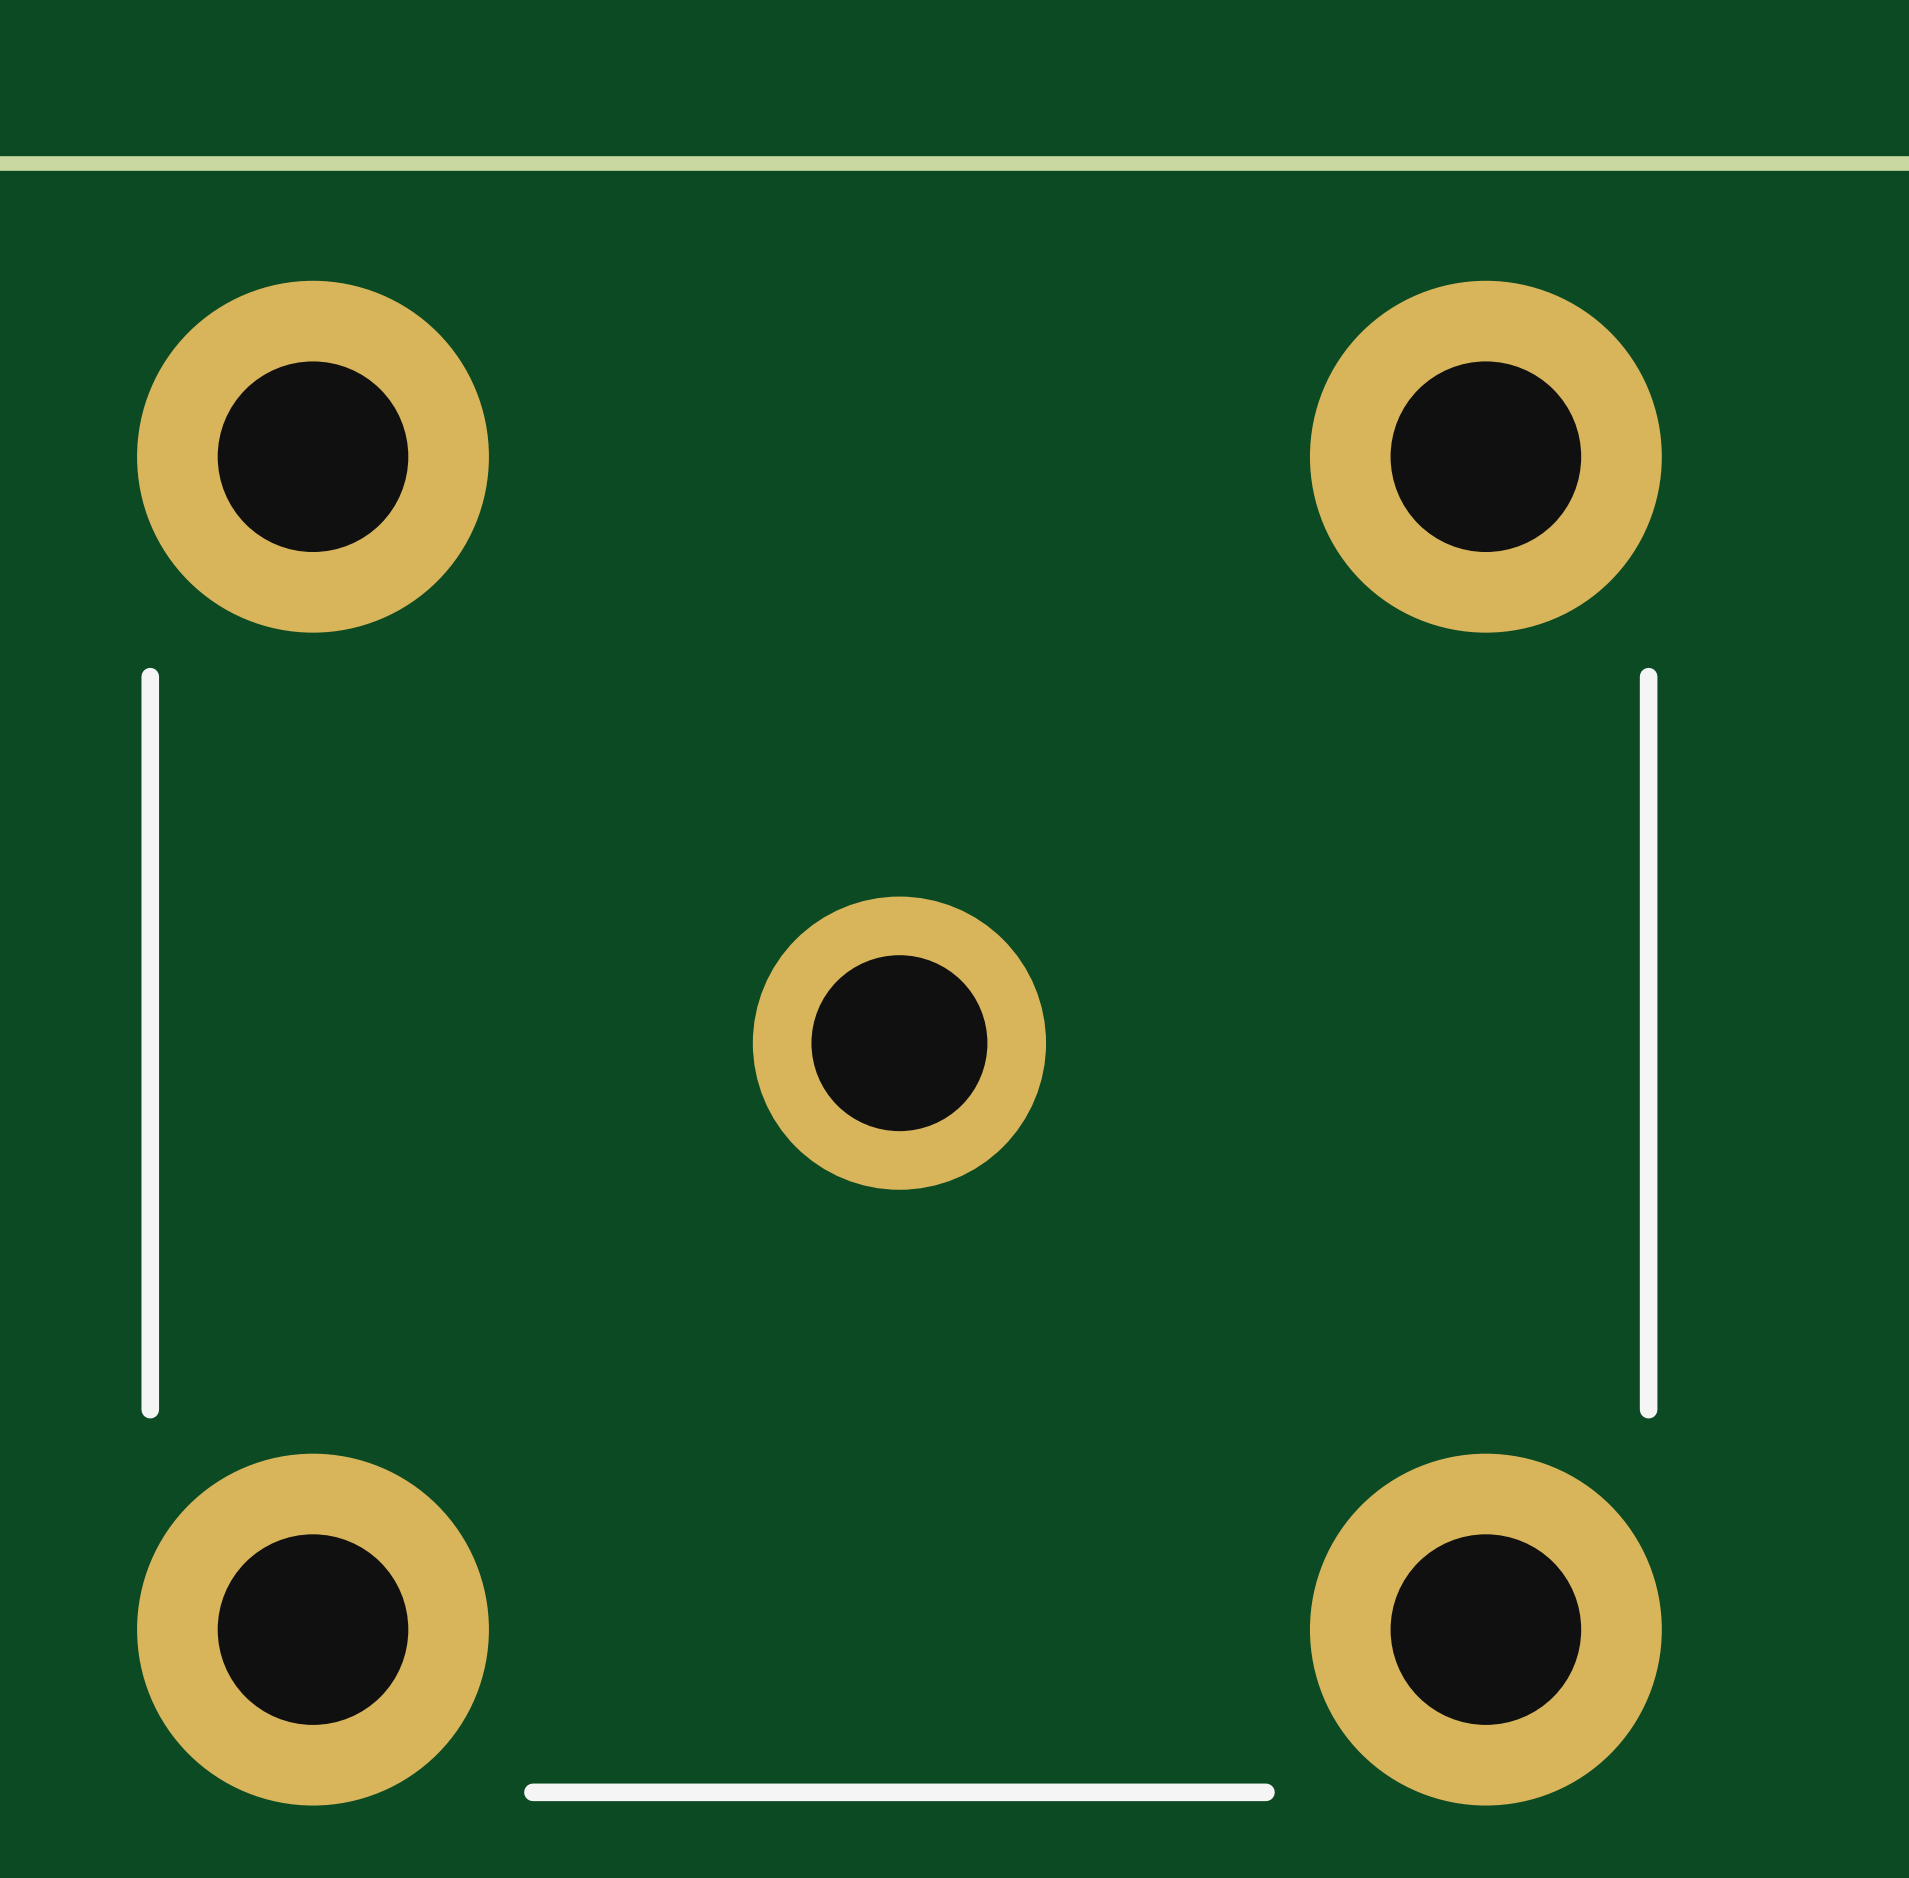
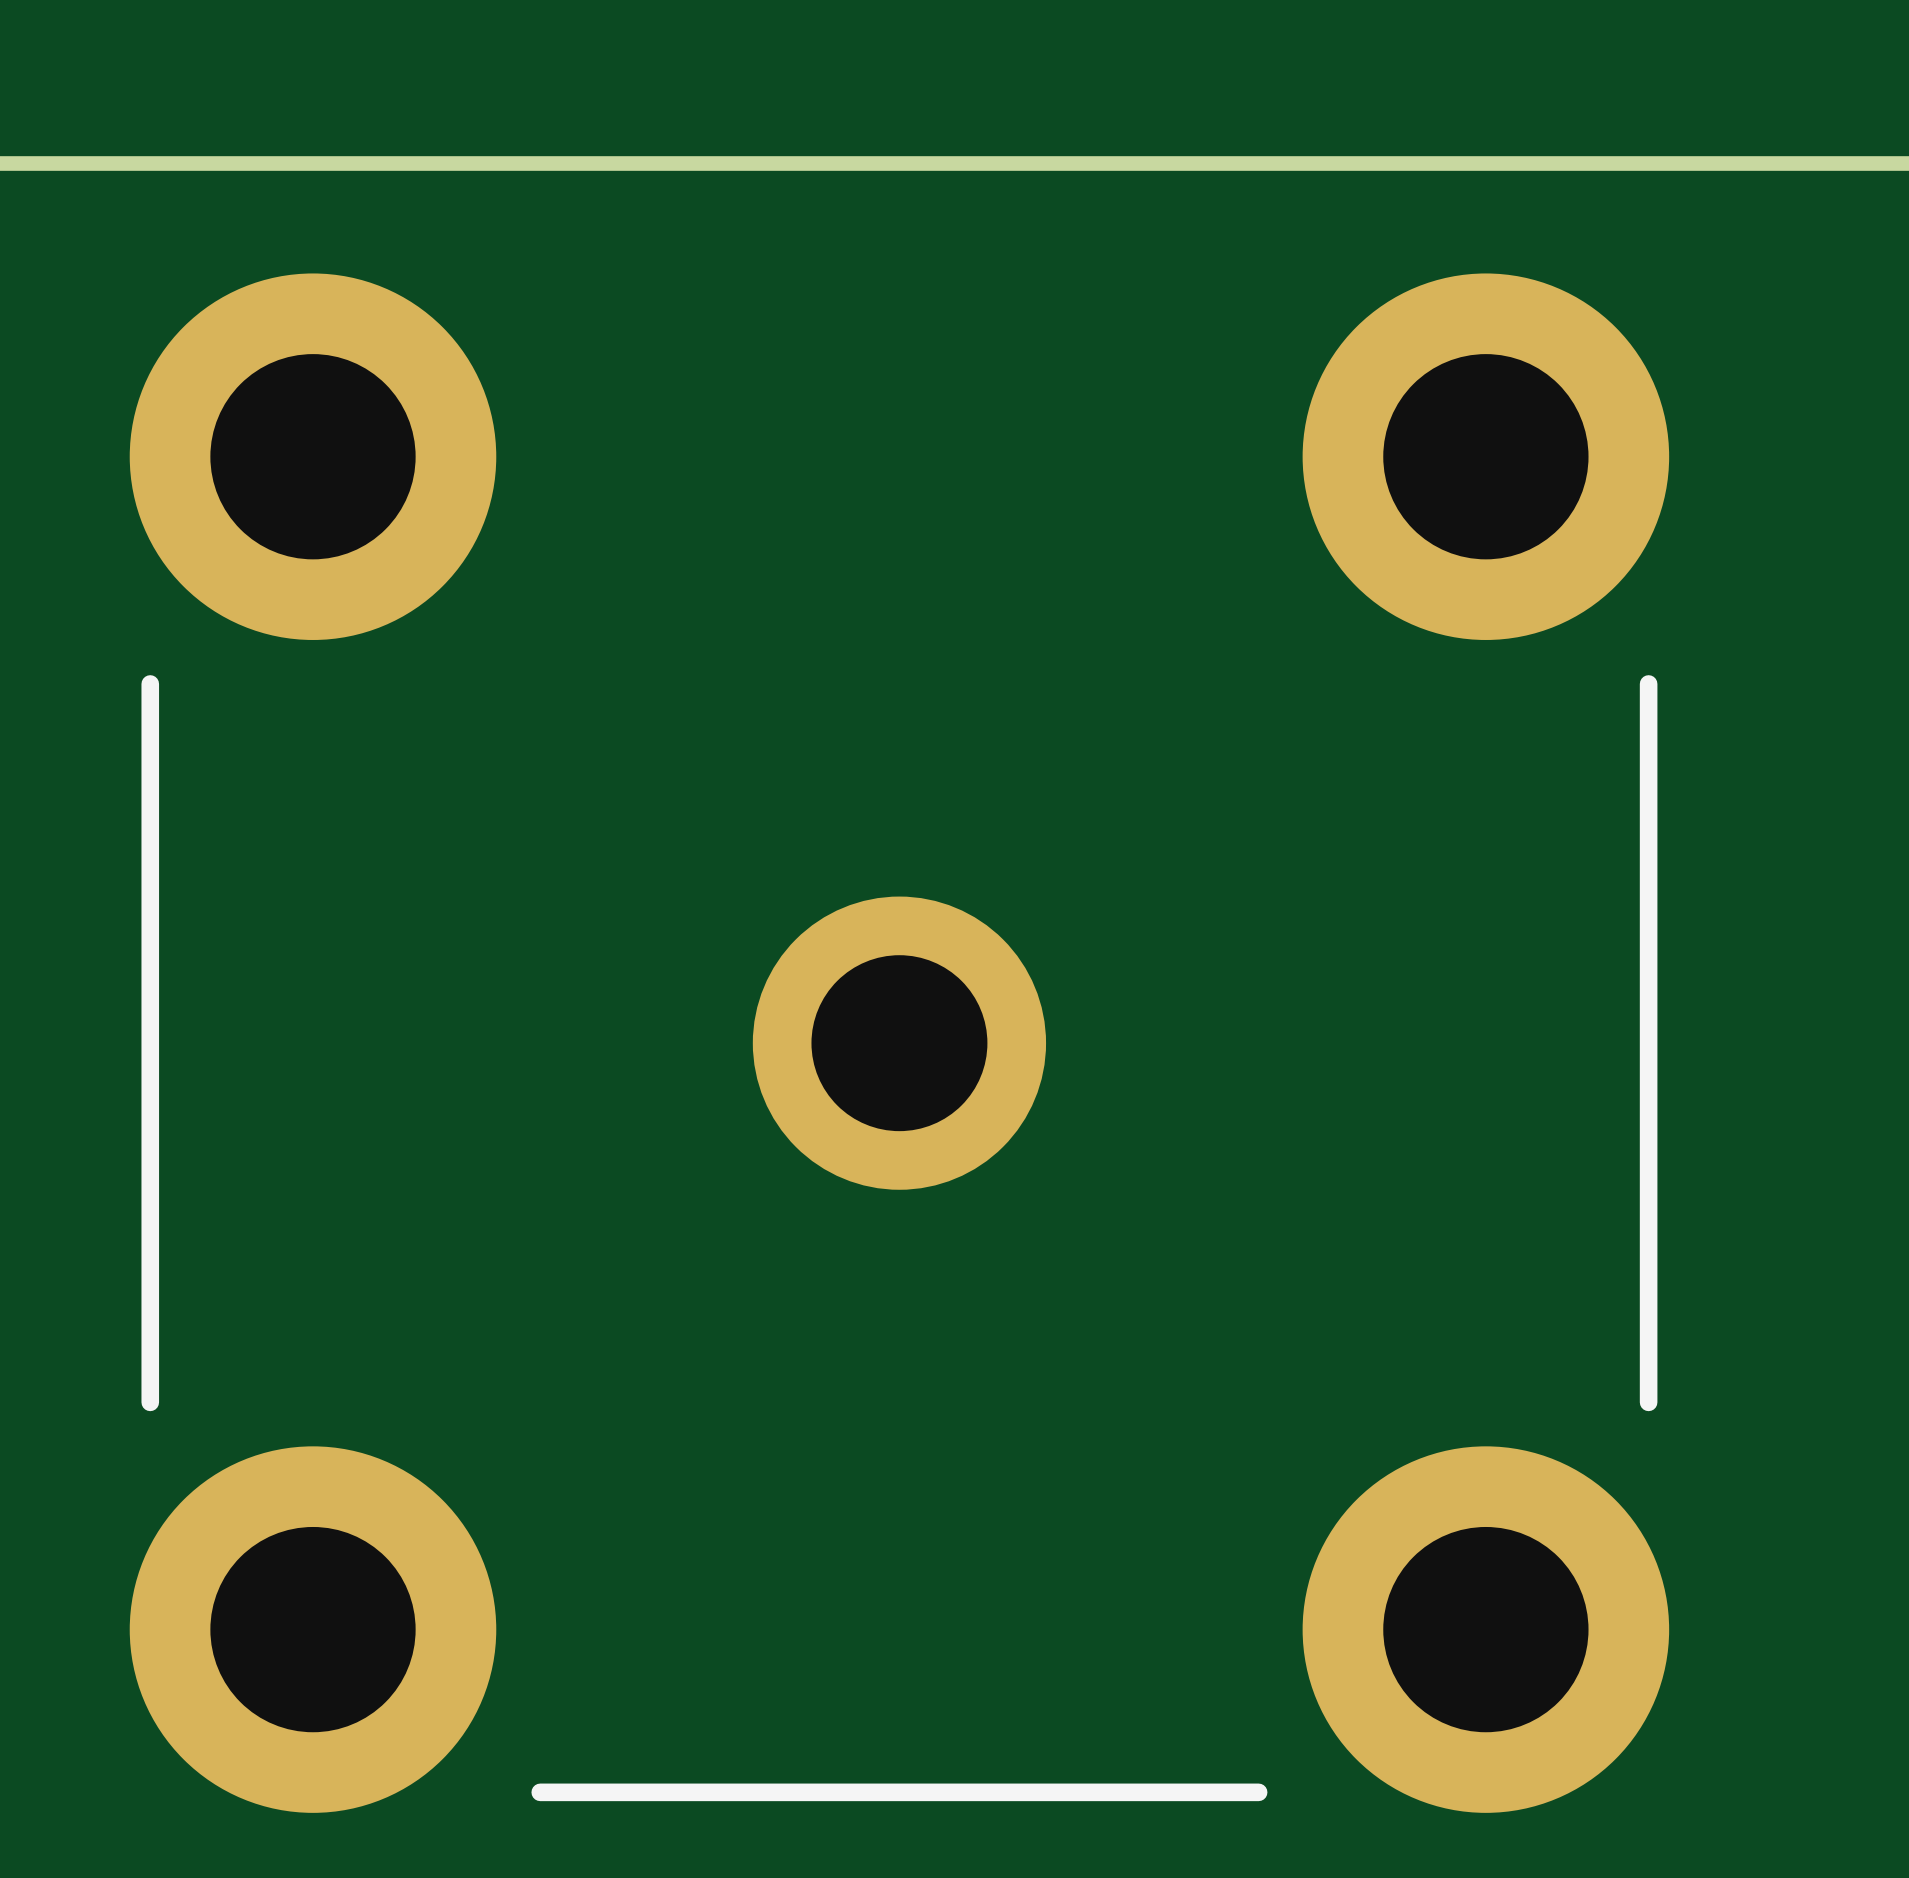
part footprint: [137, 280, 1662, 1806] -> [129, 273, 1670, 1813]

